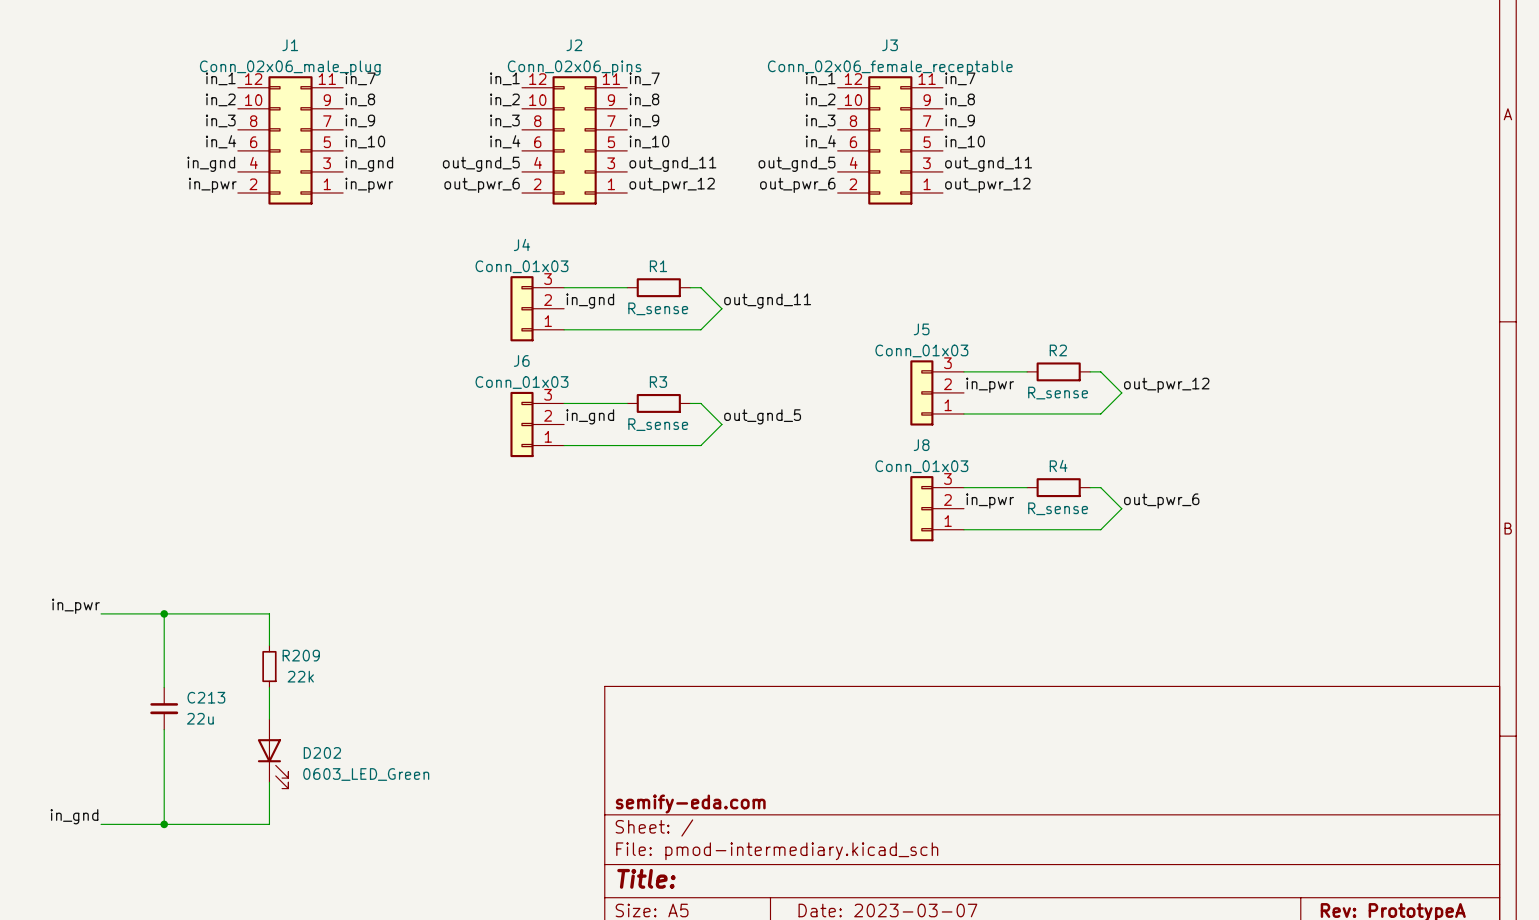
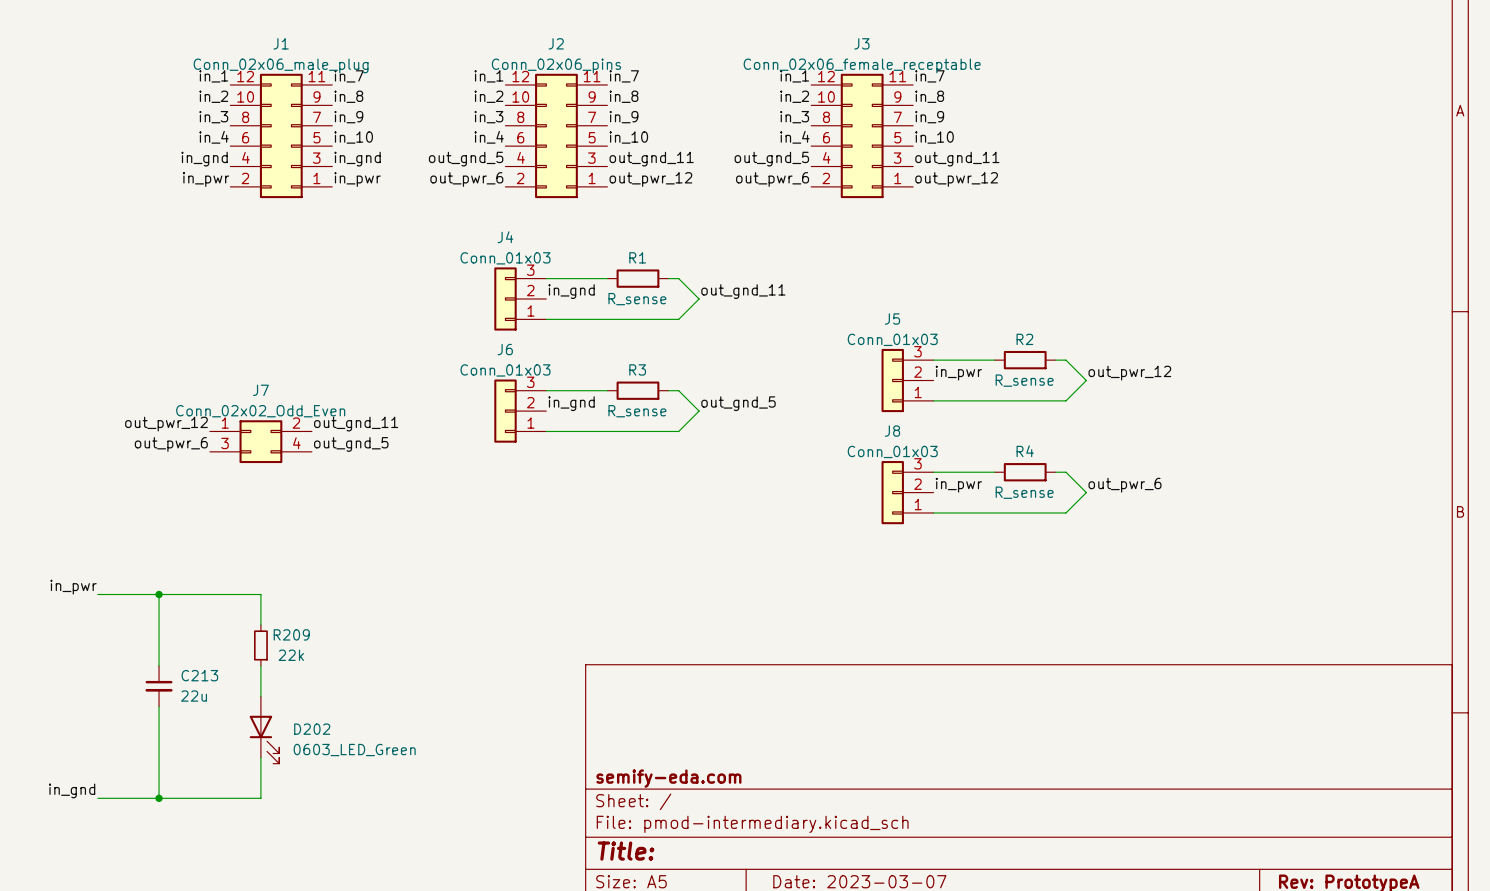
label: none -> out_pwr_12 (166, 424)
label: none -> out_gnd_11 (356, 424)
J7: none -> Conn_02x02_Odd_Even (260, 441)
label: none -> out_pwr_6 (171, 444)
label: none -> out_gnd_5 (351, 444)

